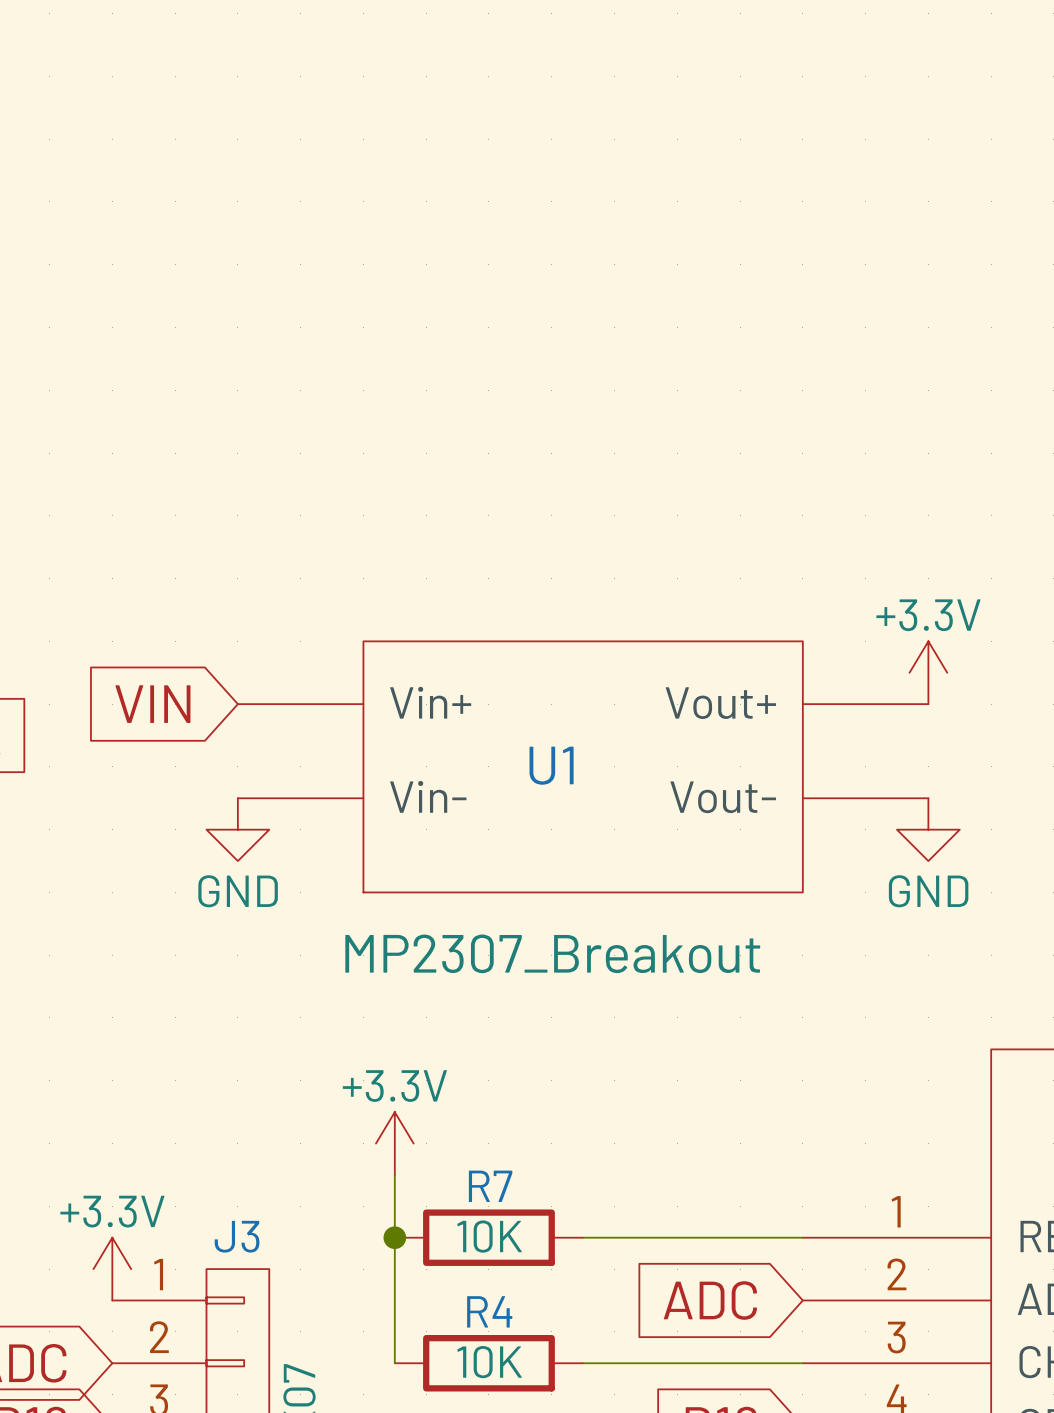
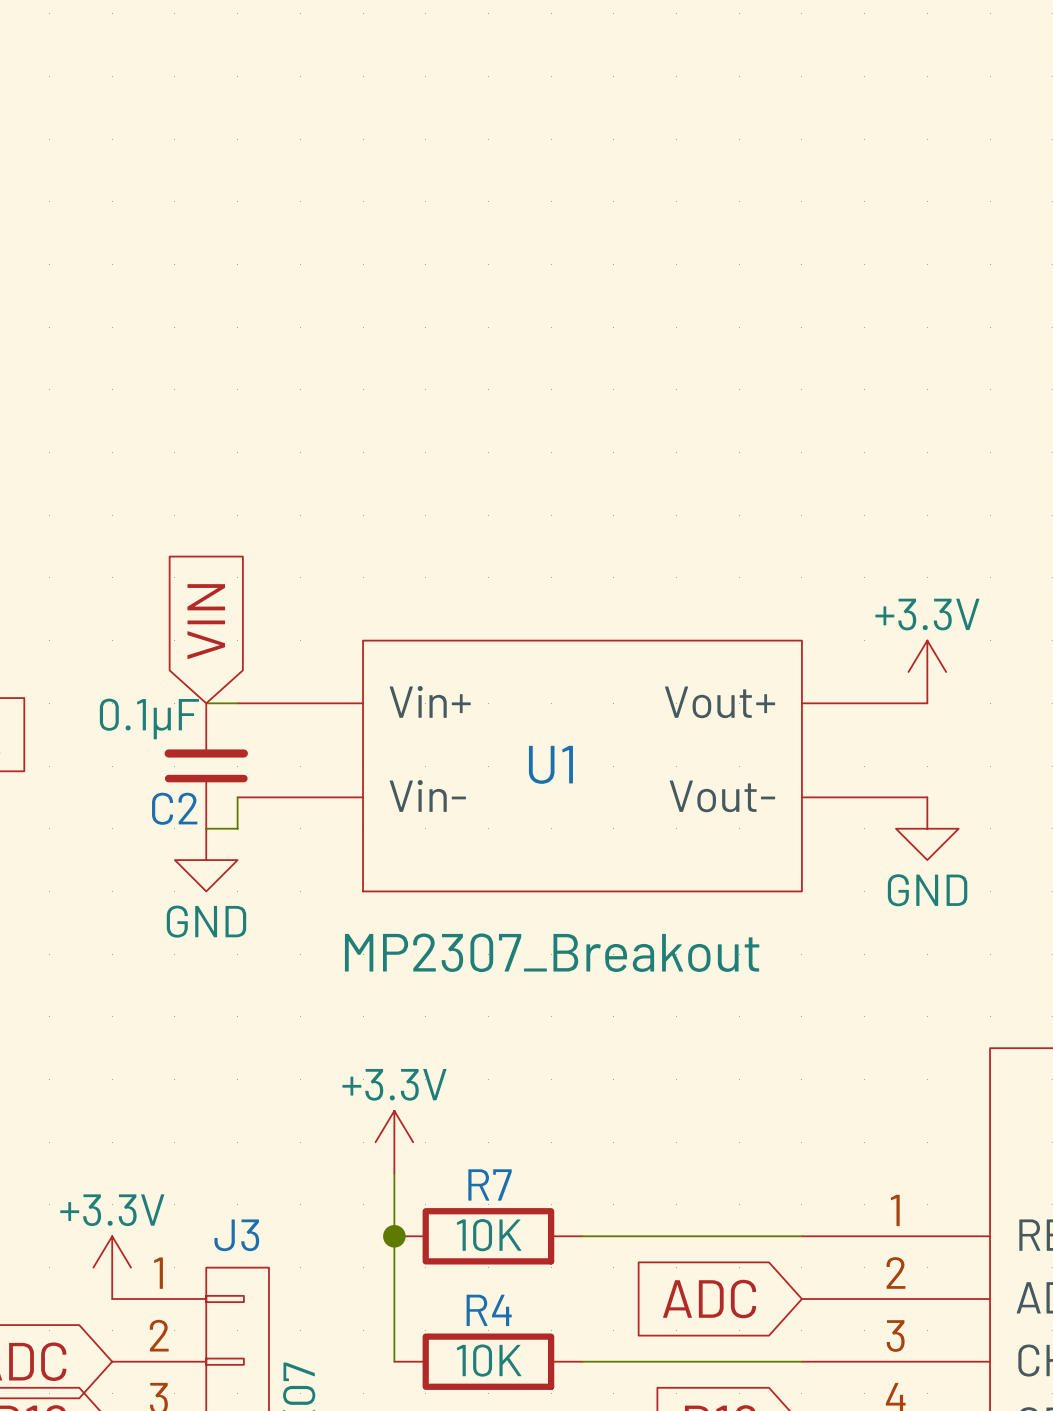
global label rotation: 0° (152, 704) -> 90° clockwise (206, 621)
wire: none -> (206, 703) (237, 703)
C2: none -> 0.1µF (206, 766)
power symbol position: GND (237, 829) -> GND (206, 860)

